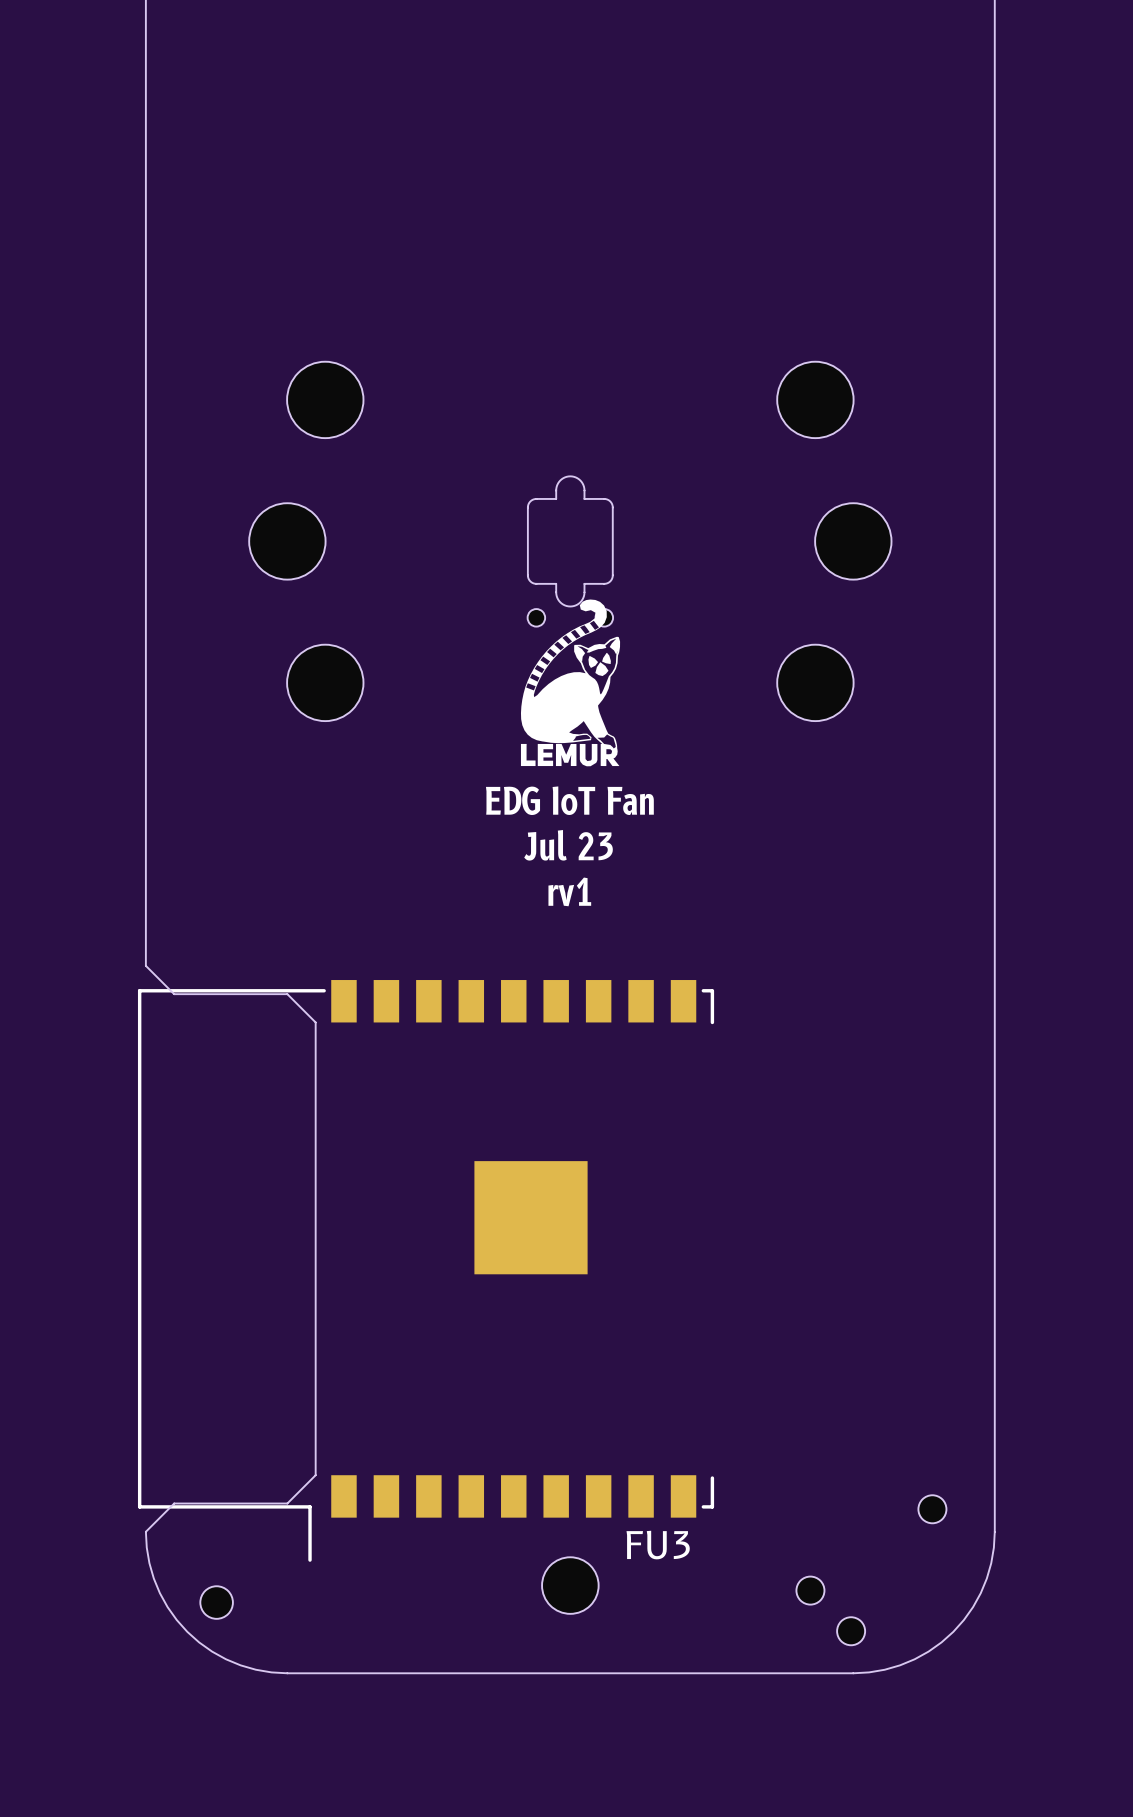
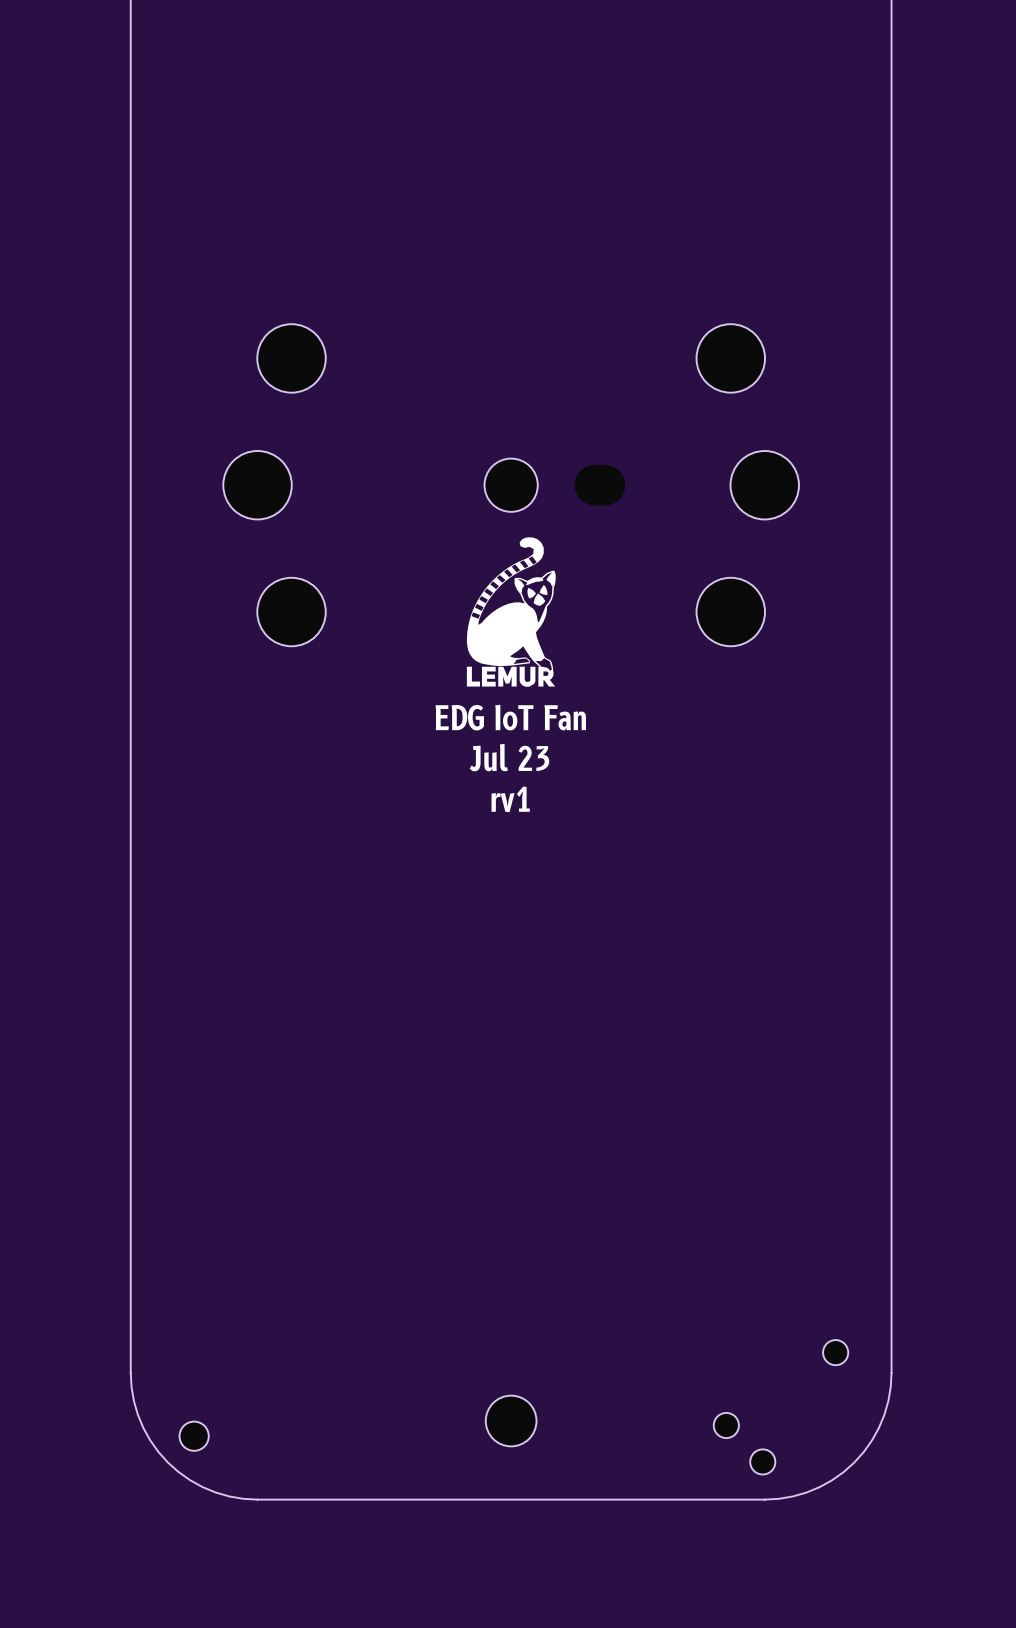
part: none -> (554, 485)
part: (570, 551) -> none
board edge: (145, 965) (174, 994) (287, 994) (315, 1022) (315, 1475) (287, 1503) (174, 1503) (145, 1531) -> (130, 865) (130, 1372)
FU3: (426, 1270) -> none

